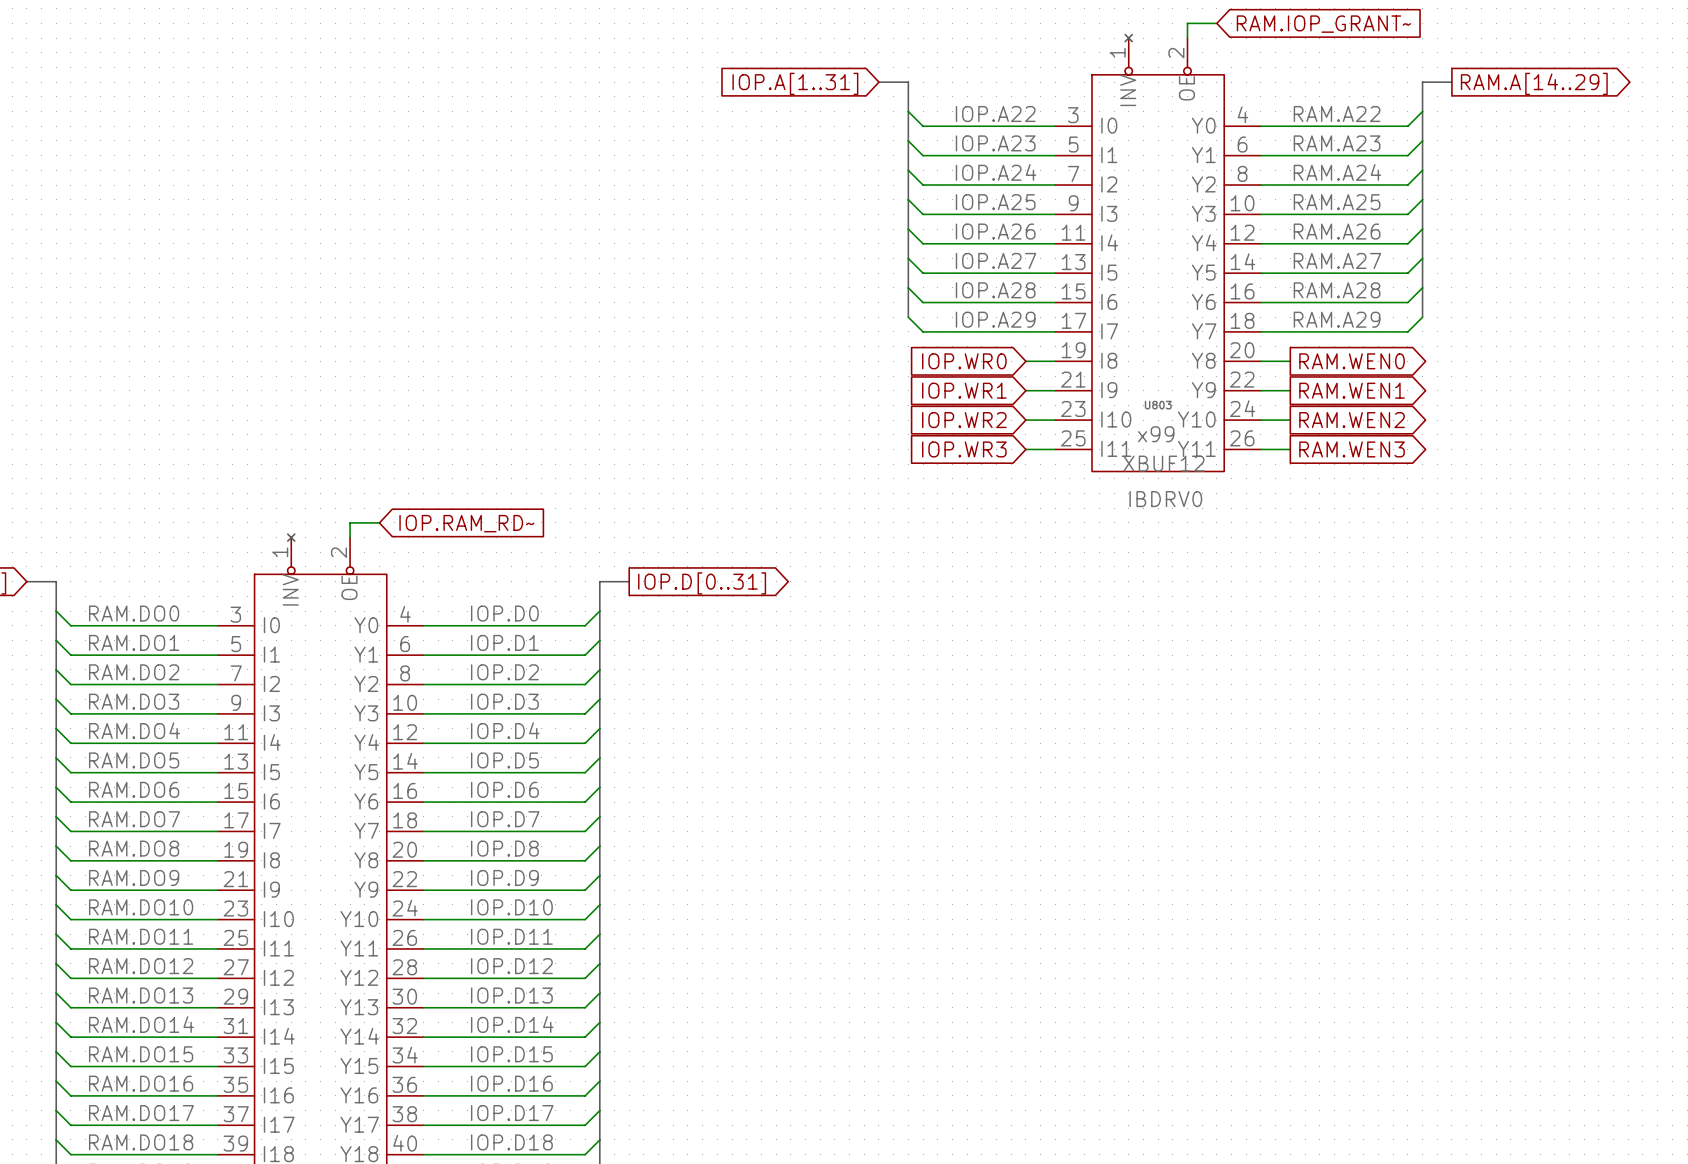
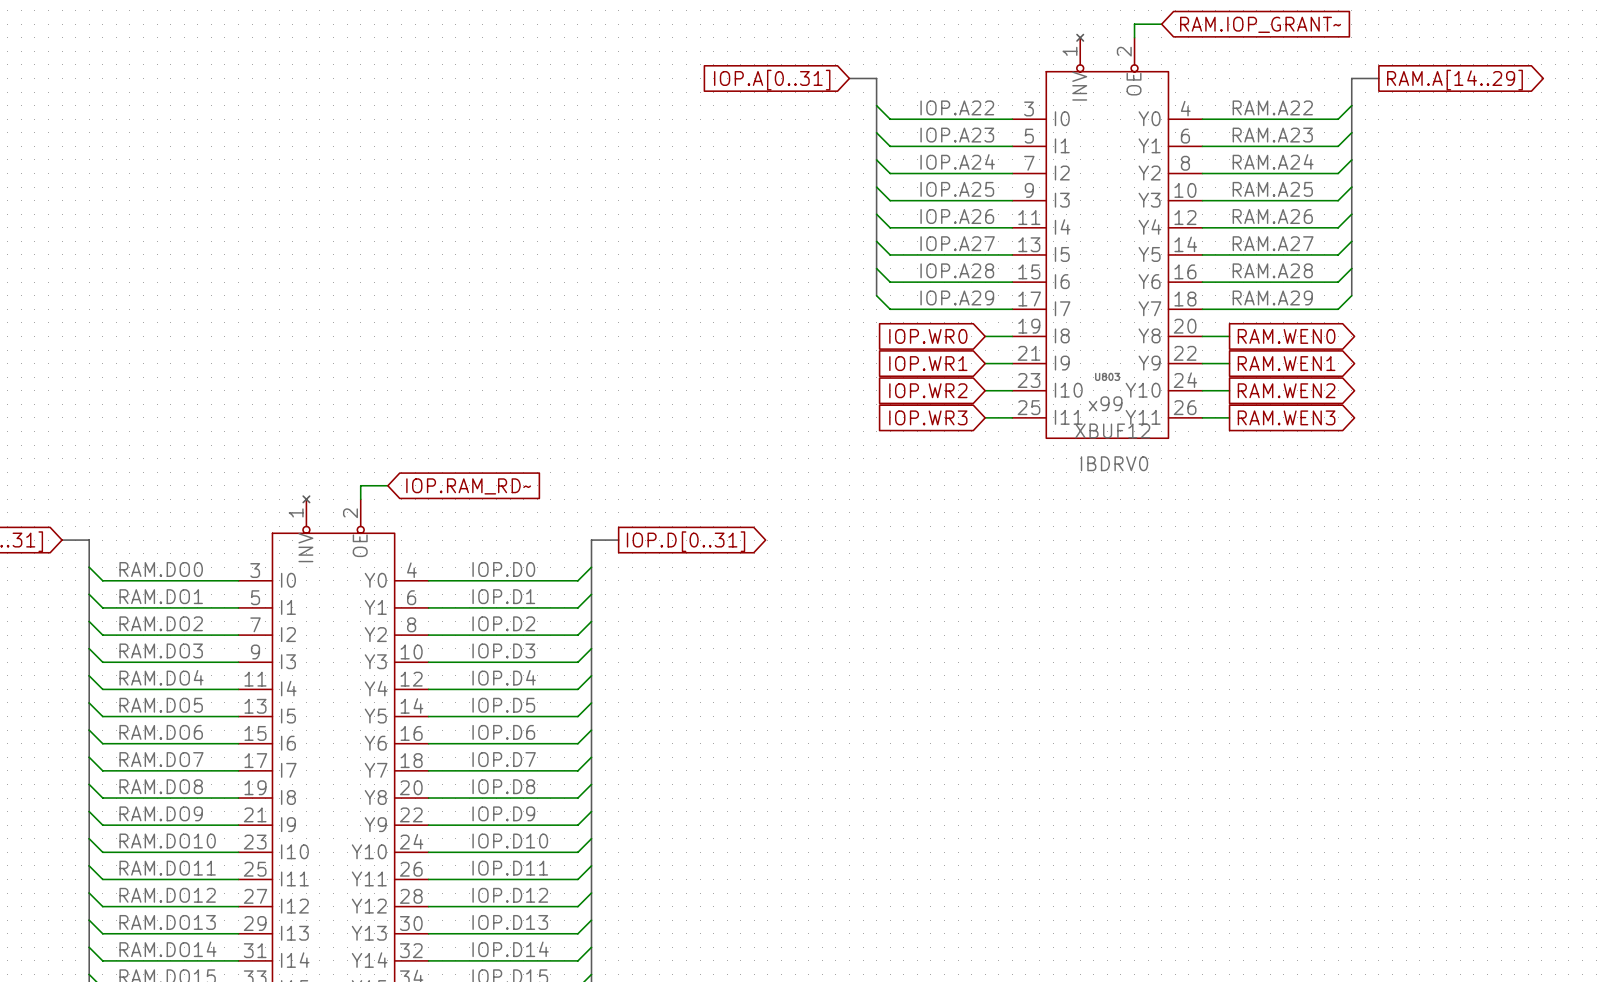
global label: IOP.A[1..31] (795, 83) -> IOP.A[0..31] (772, 80)

